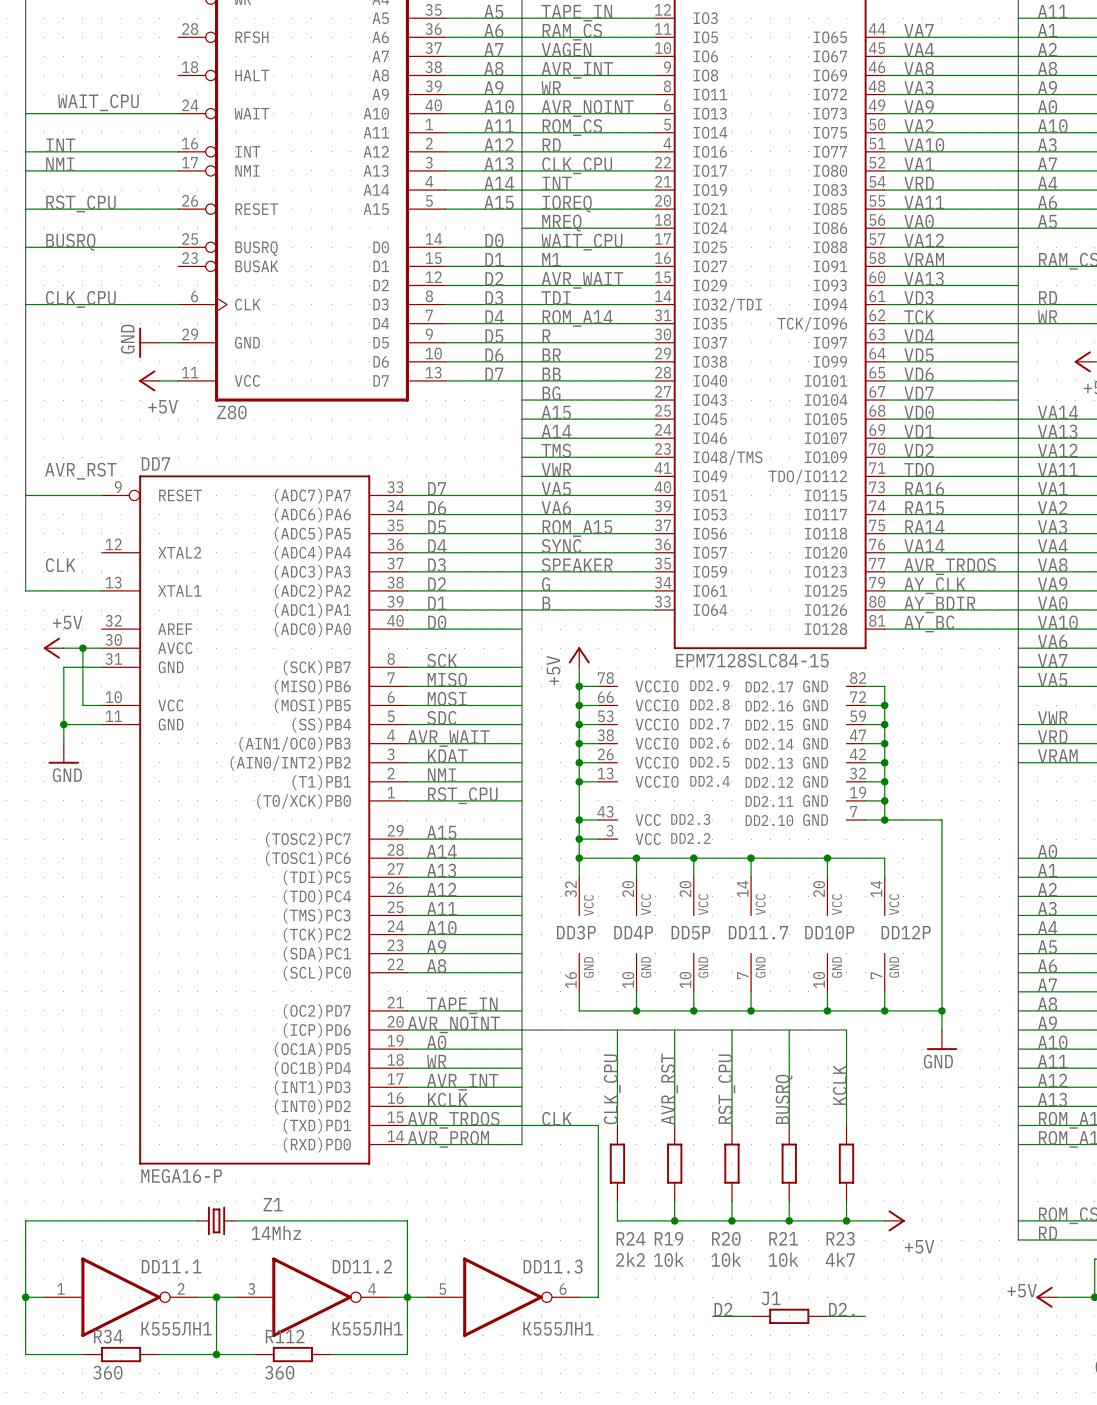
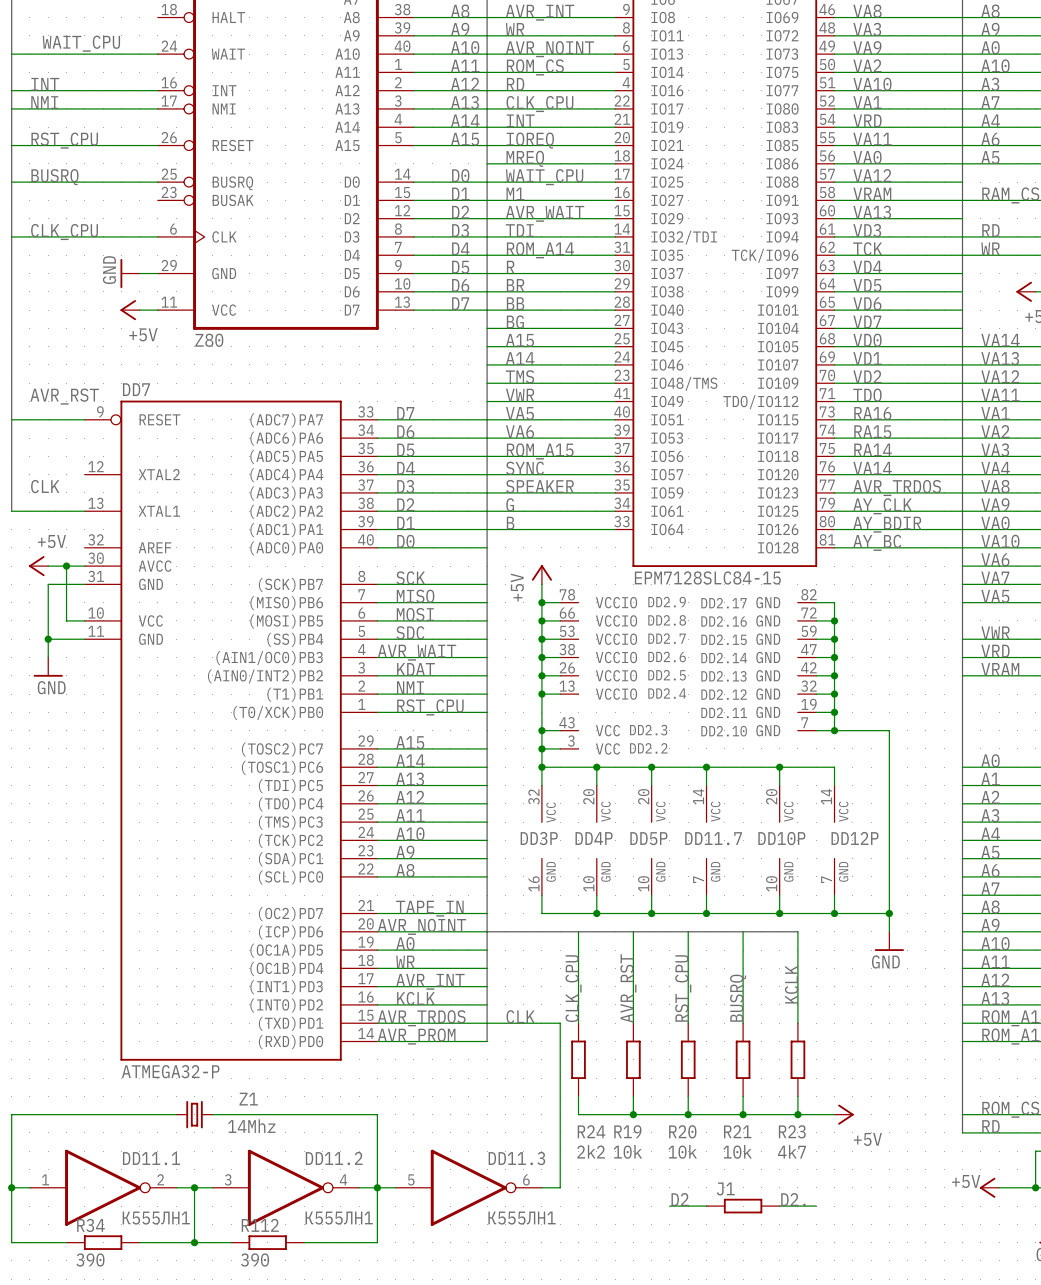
DD7 value: MEGA16-P (181, 1176) -> ATMEGA32-P (170, 1071)
R34 value: 360 (107, 1372) -> 390 (90, 1260)
R112 value: 360 (279, 1372) -> 390 (255, 1260)

